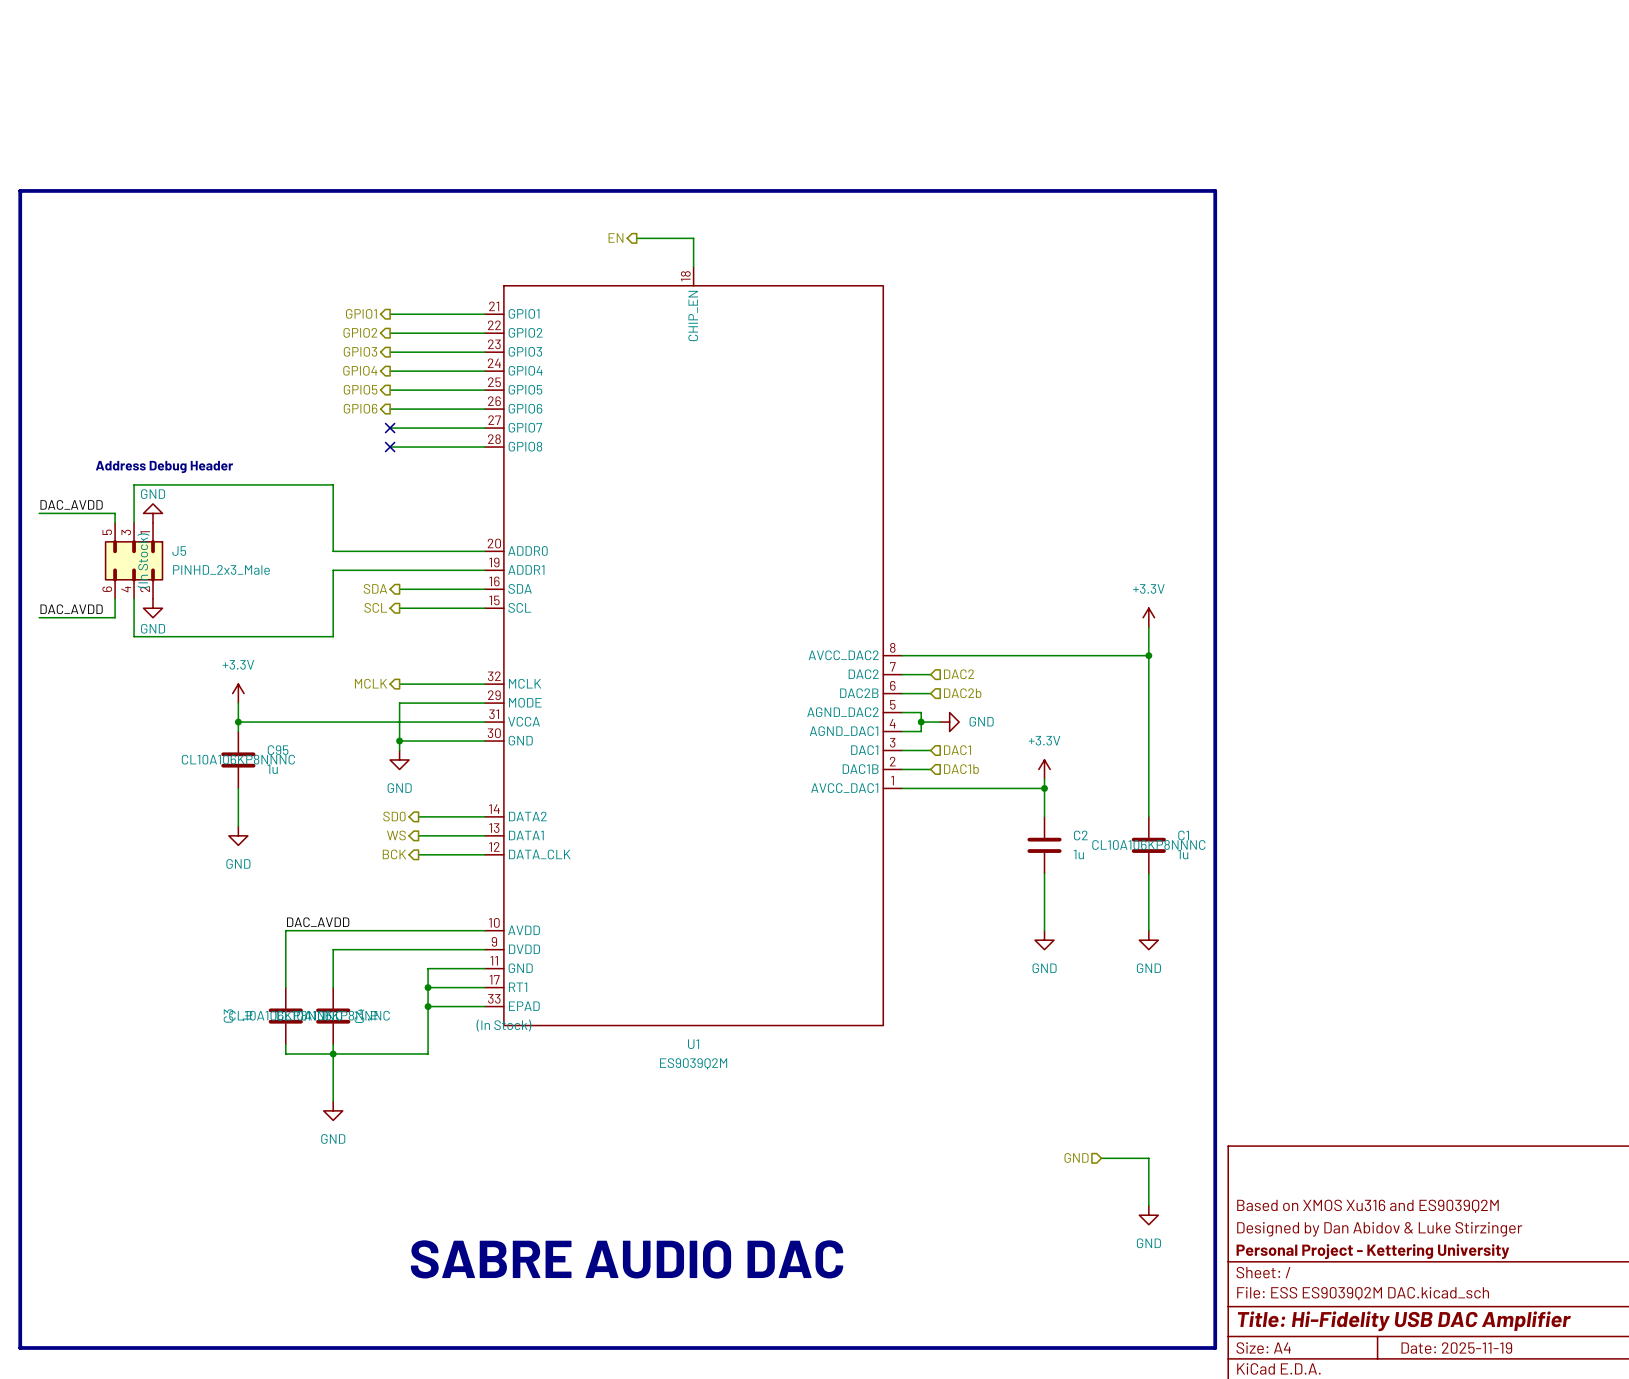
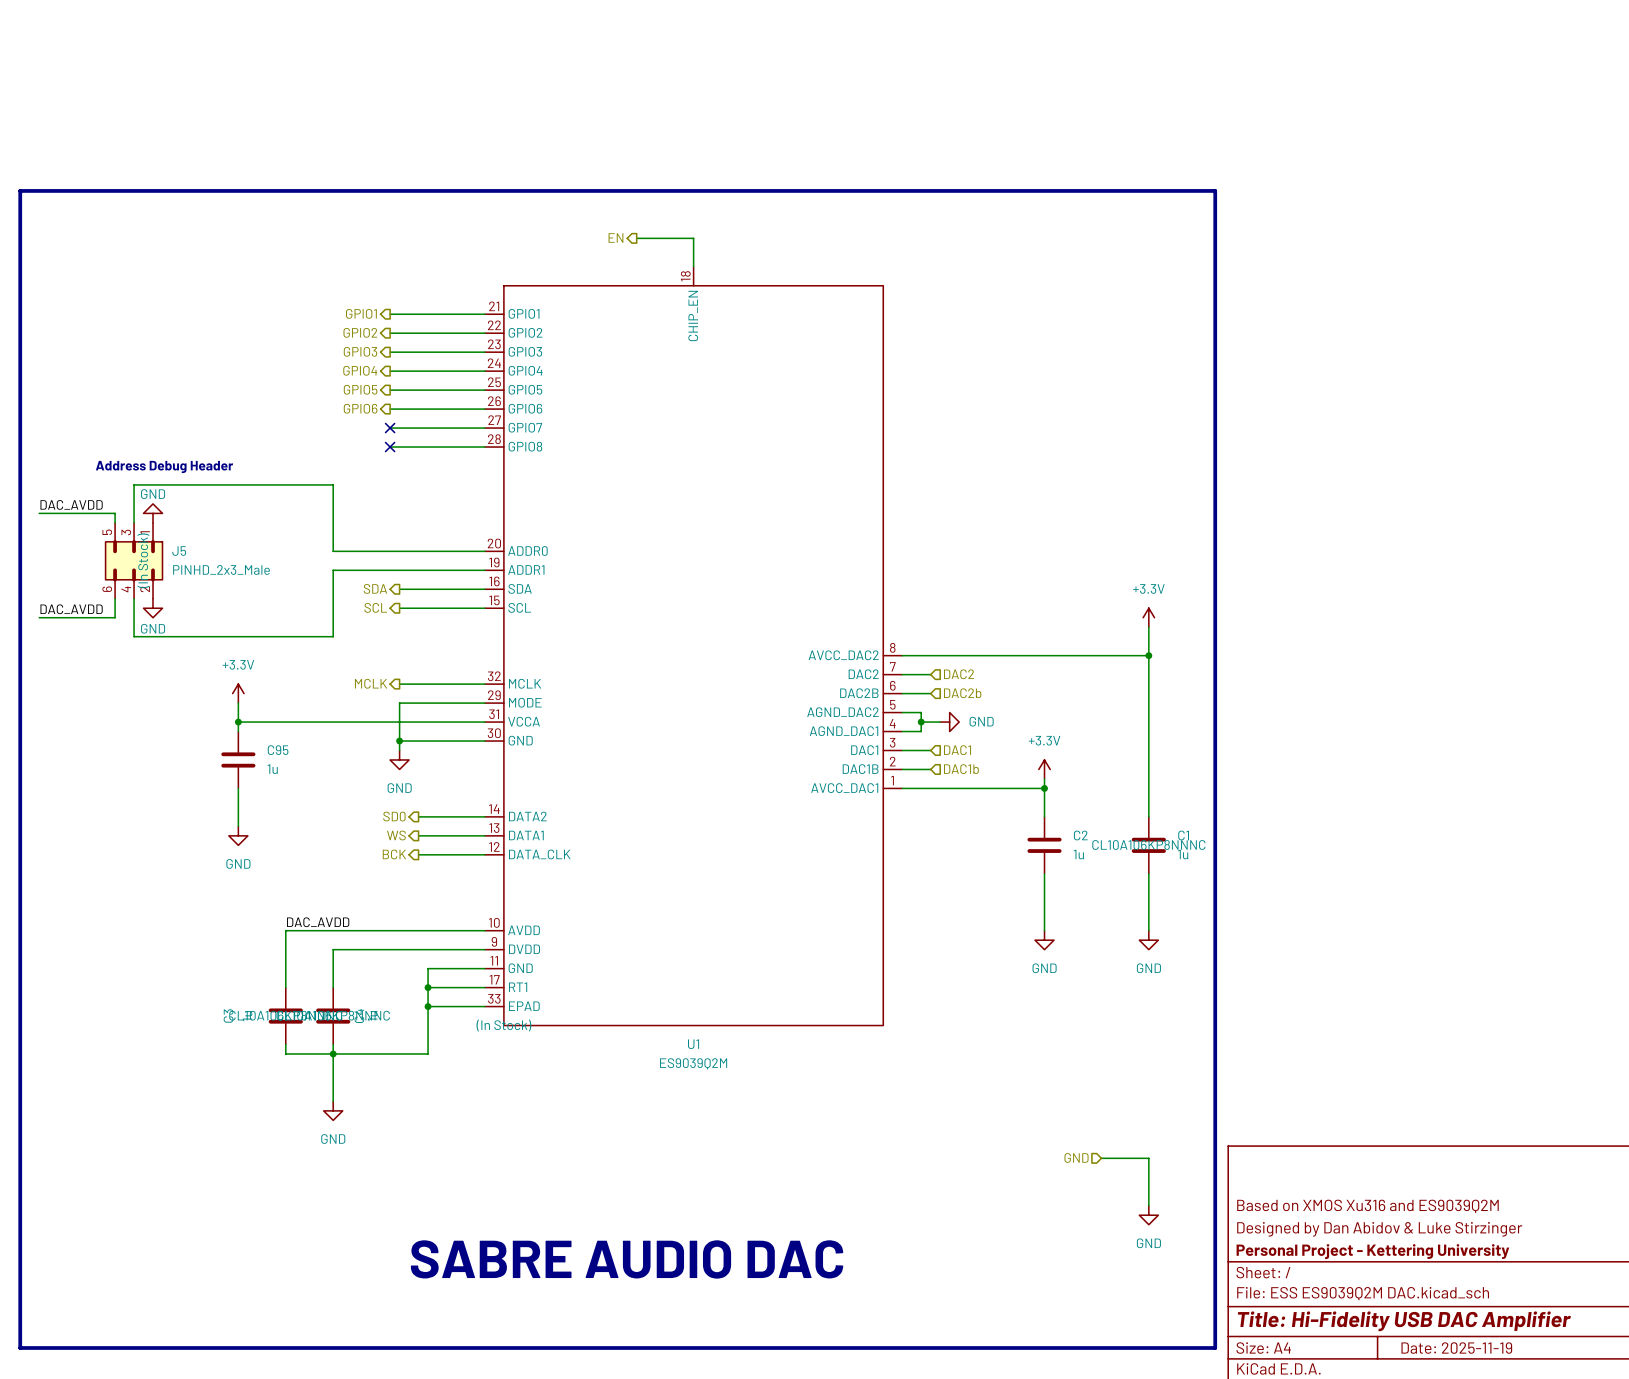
C95 text: CL10A106KP8NNNC (238, 759) -> none

